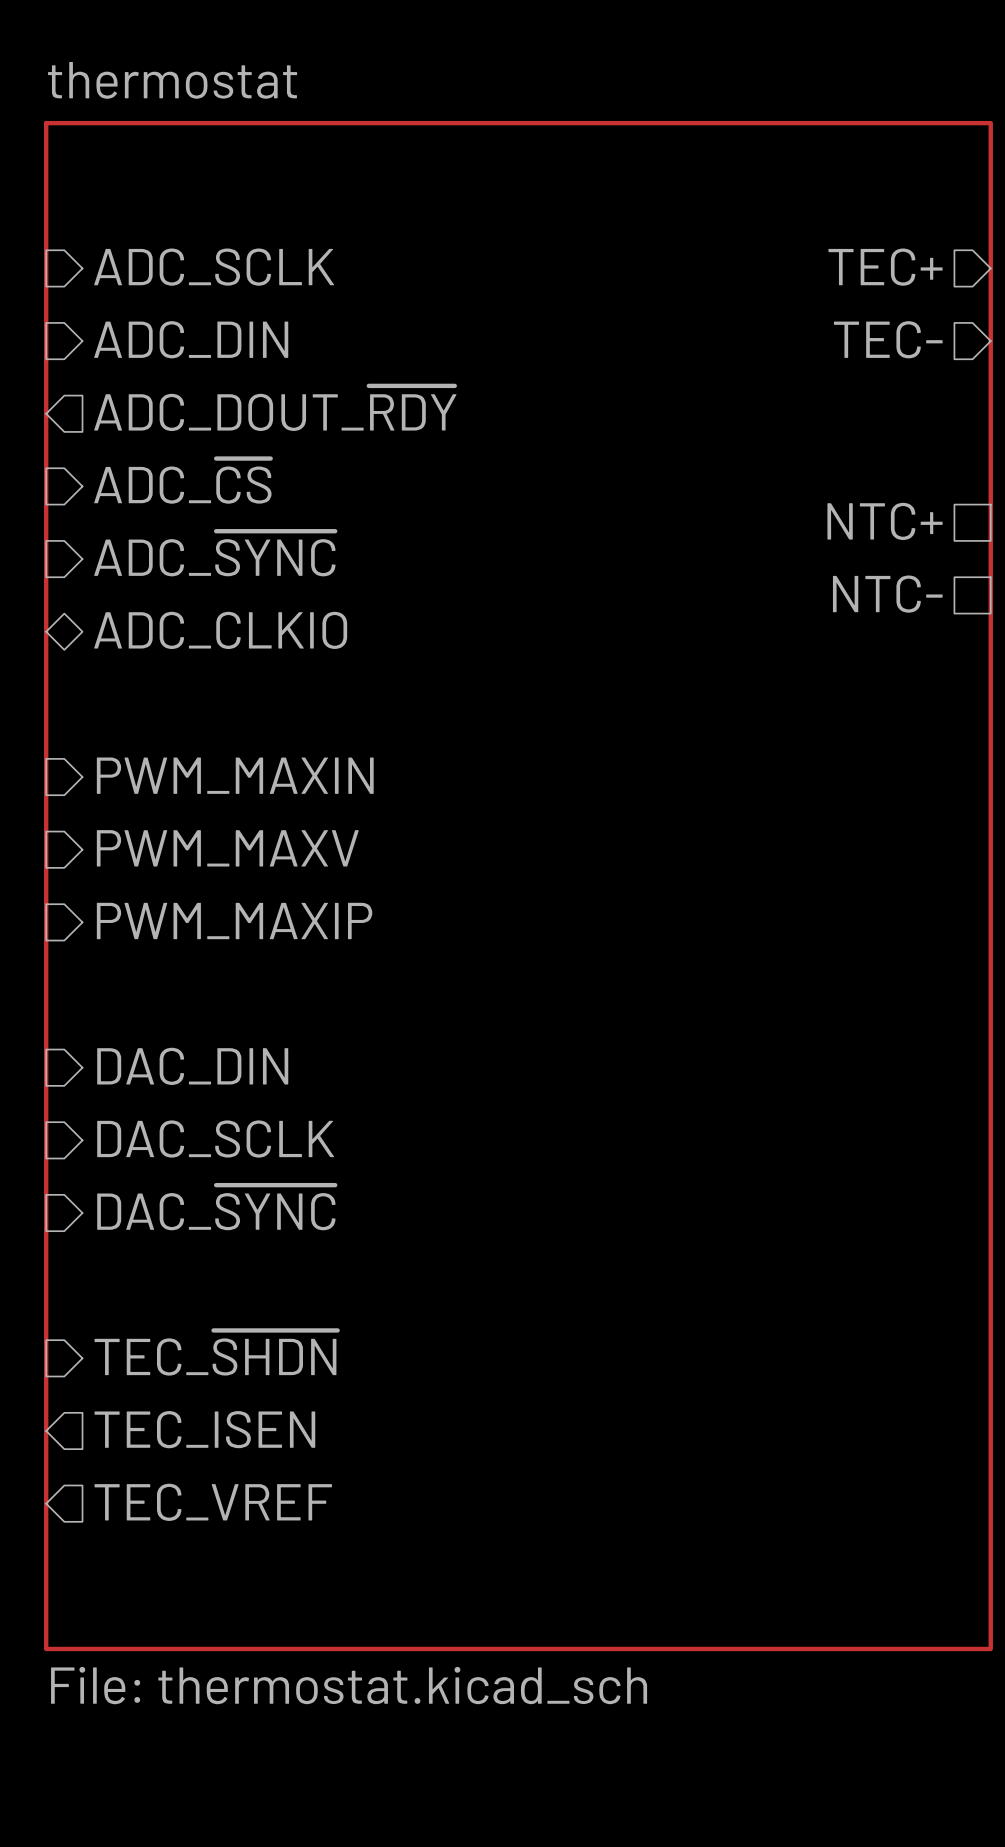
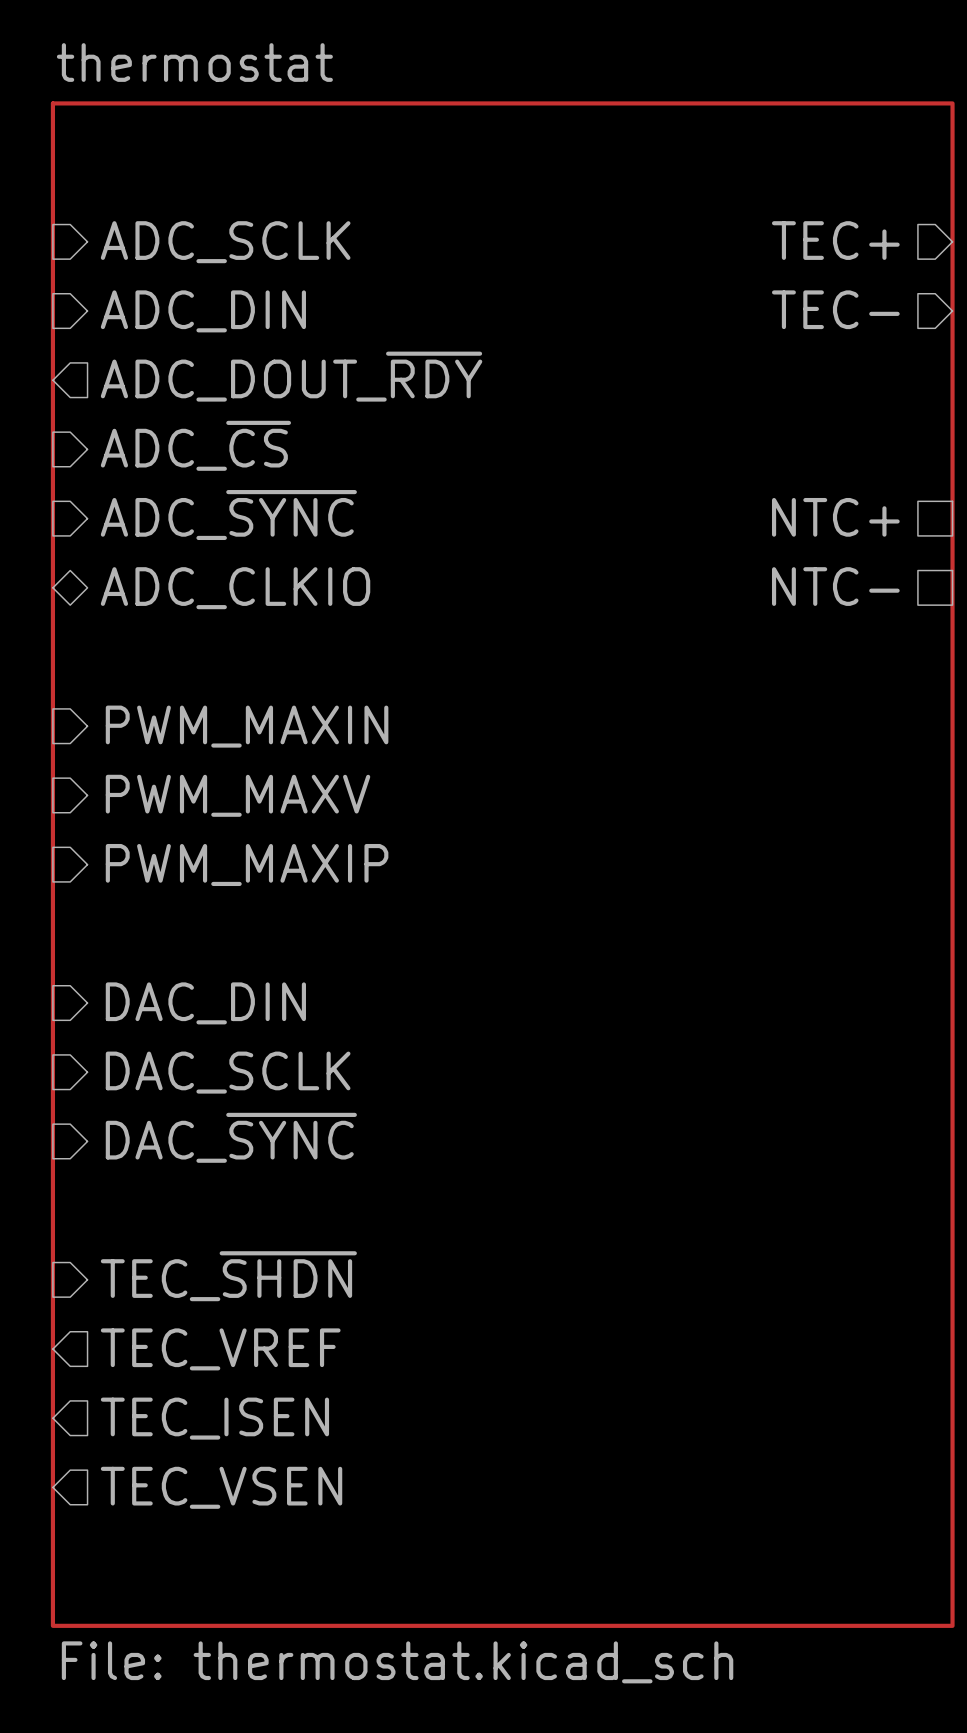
sheet pin position: NTC+ (885, 521) -> NTC+ (835, 517)
sheet pin position: NTC- (887, 594) -> NTC- (835, 586)
sheet thermostat: File: thermostat.kicad_sch (518, 886) -> none
sheet thermostat: none -> File: thermostat.kicad_sch (502, 864)
sheet pin: TEC_ISEN (204, 1429) -> TEC_VREF (220, 1349)
sheet pin: TEC_VREF (213, 1502) -> TEC_ISEN (214, 1418)
sheet pin: none -> TEC_VSEN (221, 1487)

